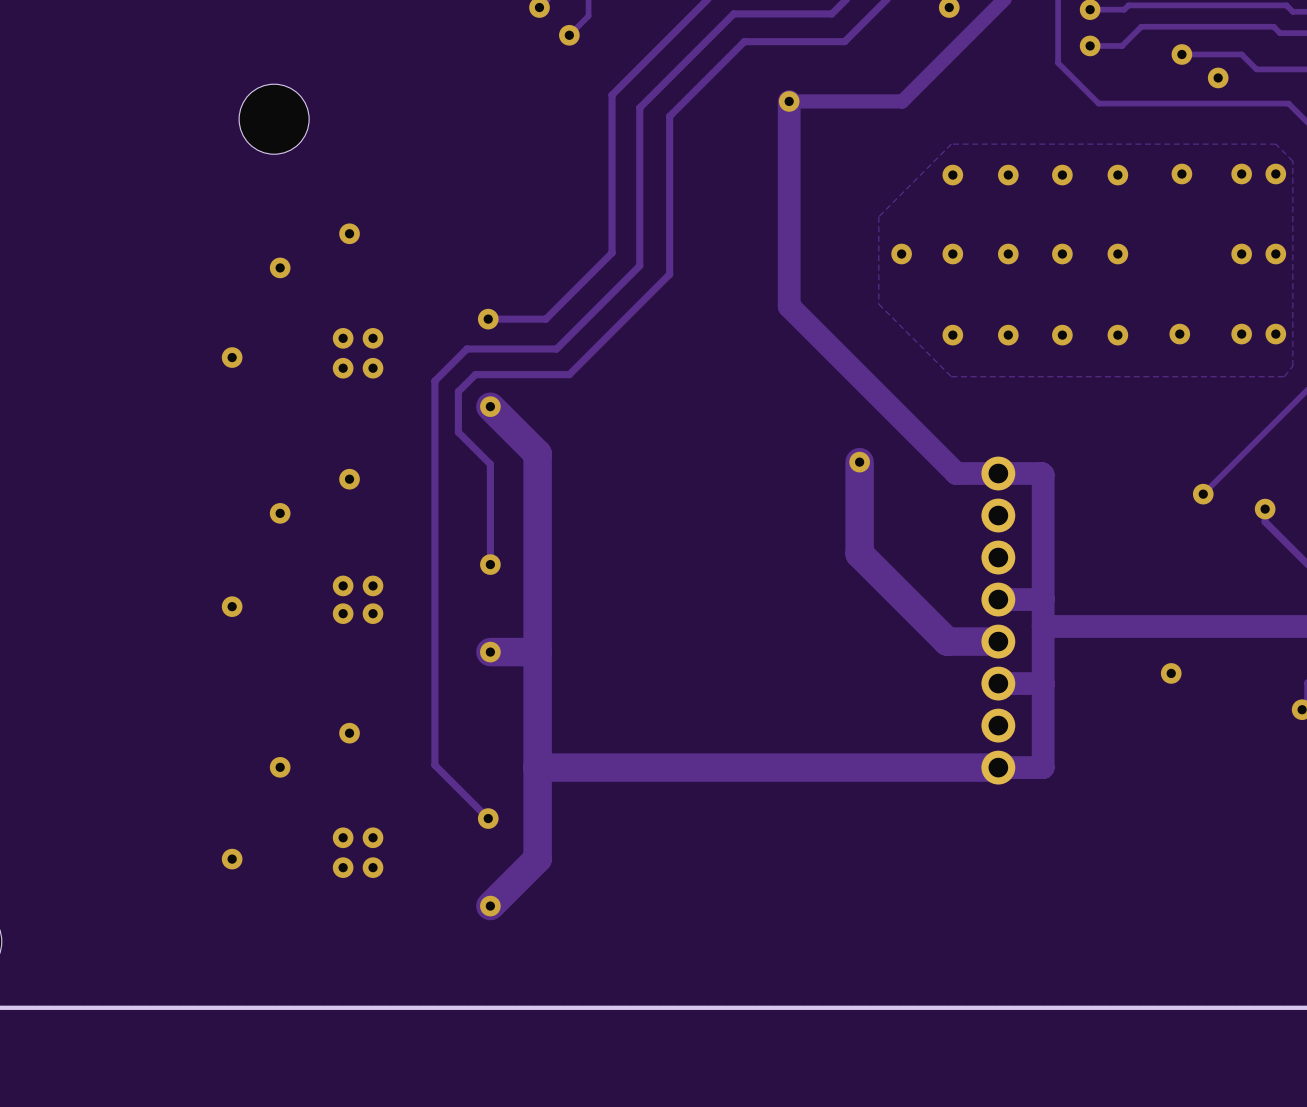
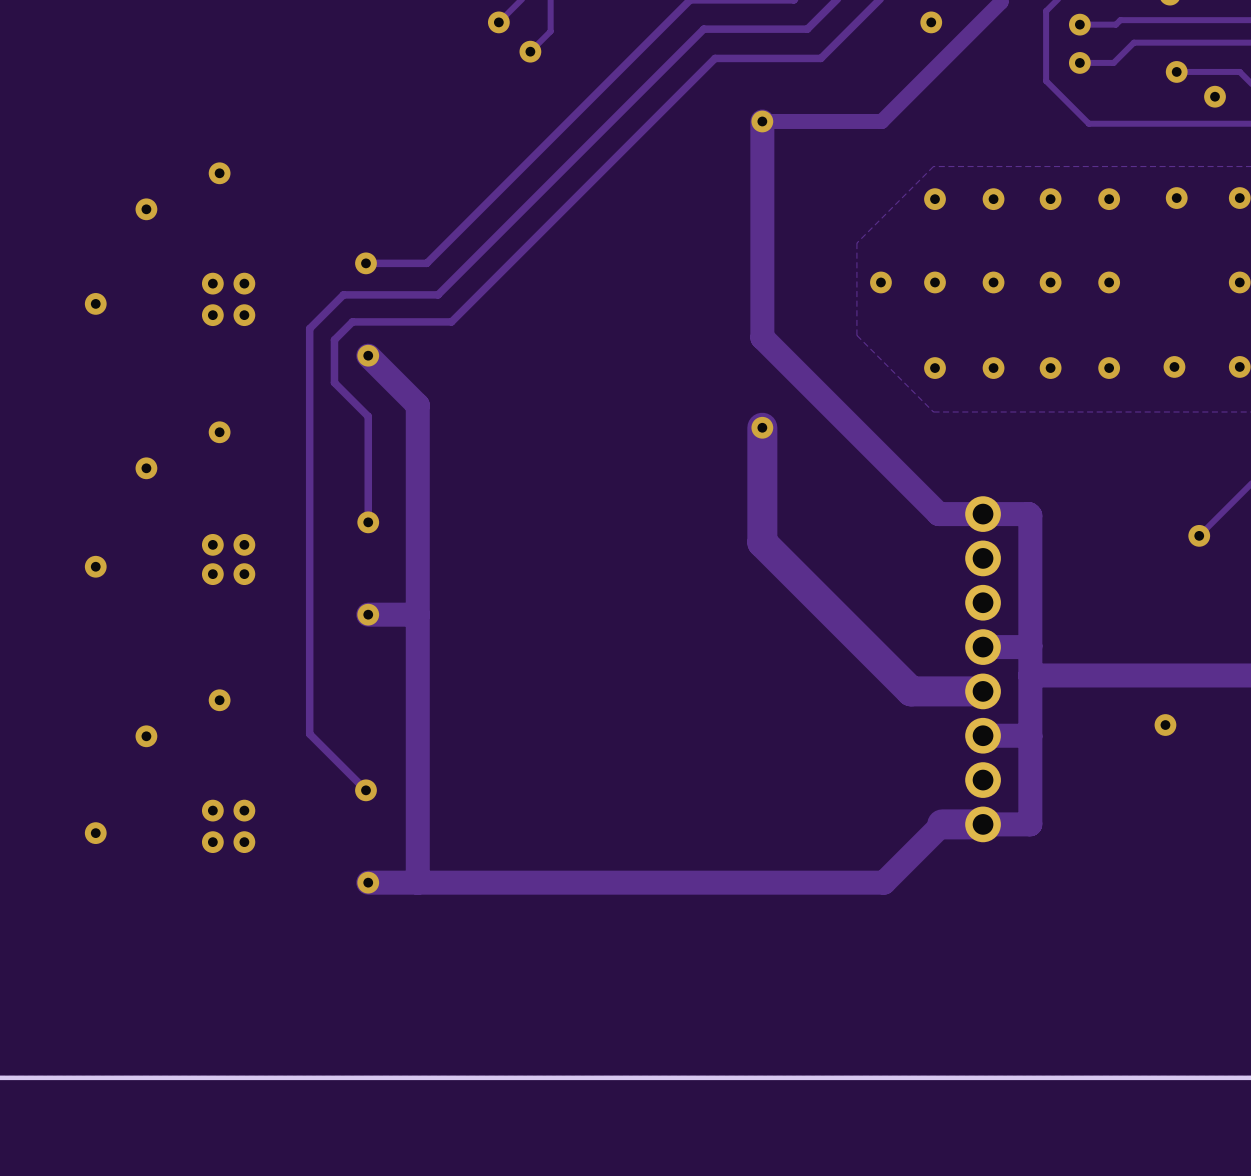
track: (612, 95) (612, 252) (545, 319) (488, 319) -> (575, 114) (426, 263) (365, 263)
track: (639, 107) (639, 265) (556, 349) (466, 349) (434, 381) (434, 765) (488, 818) -> (604, 128) (438, 294) (343, 294) (309, 328) (309, 734) (365, 790)
track: (669, 116) (669, 274) (569, 374) (475, 374) (458, 391) (458, 432) (490, 464) (490, 564) -> (636, 137) (451, 321) (352, 321) (334, 339) (334, 382) (368, 416) (368, 522)
hole: (274, 119) -> none
via: none -> (219, 173)
via: none -> (146, 209)
via: (349, 233) -> none
via: none -> (365, 263)
via: none -> (212, 283)
via: none -> (244, 283)
via: (280, 267) -> none
via: none -> (95, 303)
via: none -> (212, 315)
via: none -> (244, 315)
via: (488, 319) -> none
track: none -> (368, 355) (417, 405) (417, 882)
via: none -> (368, 355)
via: (343, 338) -> none
via: (373, 338) -> none
via: (232, 357) -> none
via: (343, 368) -> none
via: (373, 368) -> none
via: none -> (219, 432)
track: (490, 406) (537, 453) (537, 858) (490, 906) -> none
via: (490, 406) -> none
via: none -> (146, 468)
track: (859, 462) (859, 553) (947, 641) -> (762, 427) (762, 542) (911, 691) (929, 691)
via position: (859, 462) -> (762, 427)
via: (349, 479) -> none
via: none -> (368, 522)
via: none -> (212, 544)
via: none -> (244, 544)
via: (280, 513) -> none
via: none -> (95, 566)
via: none -> (212, 574)
via: none -> (244, 574)
via: (490, 564) -> none
via: none -> (368, 614)
via: (343, 585) -> none
via: (373, 585) -> none
via: (232, 606) -> none
via: (343, 613) -> none
via: (373, 613) -> none
via: none -> (219, 700)
via: (490, 652) -> none
track: (537, 652) (490, 652) -> (417, 614) (368, 614)
via: none -> (146, 736)
via: (349, 733) -> none
via: none -> (365, 790)
via: none -> (212, 810)
via: none -> (244, 810)
via: (280, 767) -> none
track: (959, 767) (537, 767) -> (942, 824) (883, 882) (368, 882)
via: none -> (95, 833)
via: none -> (212, 842)
via: none -> (244, 842)
via: (488, 818) -> none
via: none -> (368, 882)
via: (343, 837) -> none
via: (373, 837) -> none
via: (232, 859) -> none
via: (343, 867) -> none
via: (373, 867) -> none
via: (490, 906) -> none

